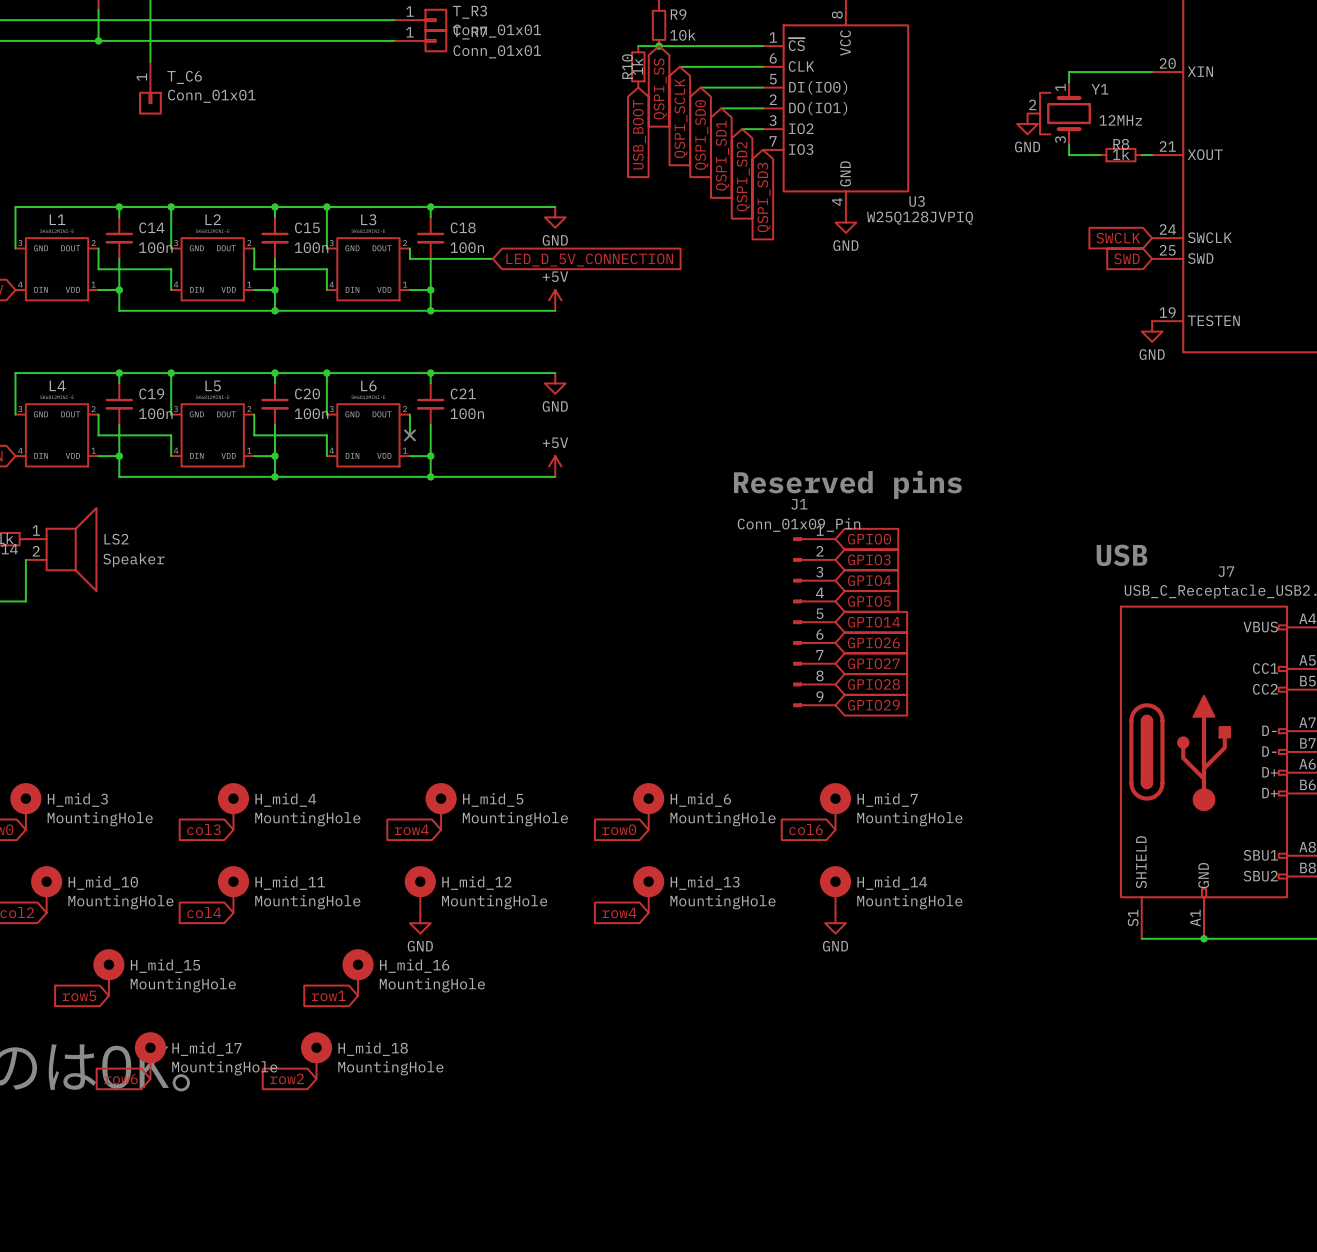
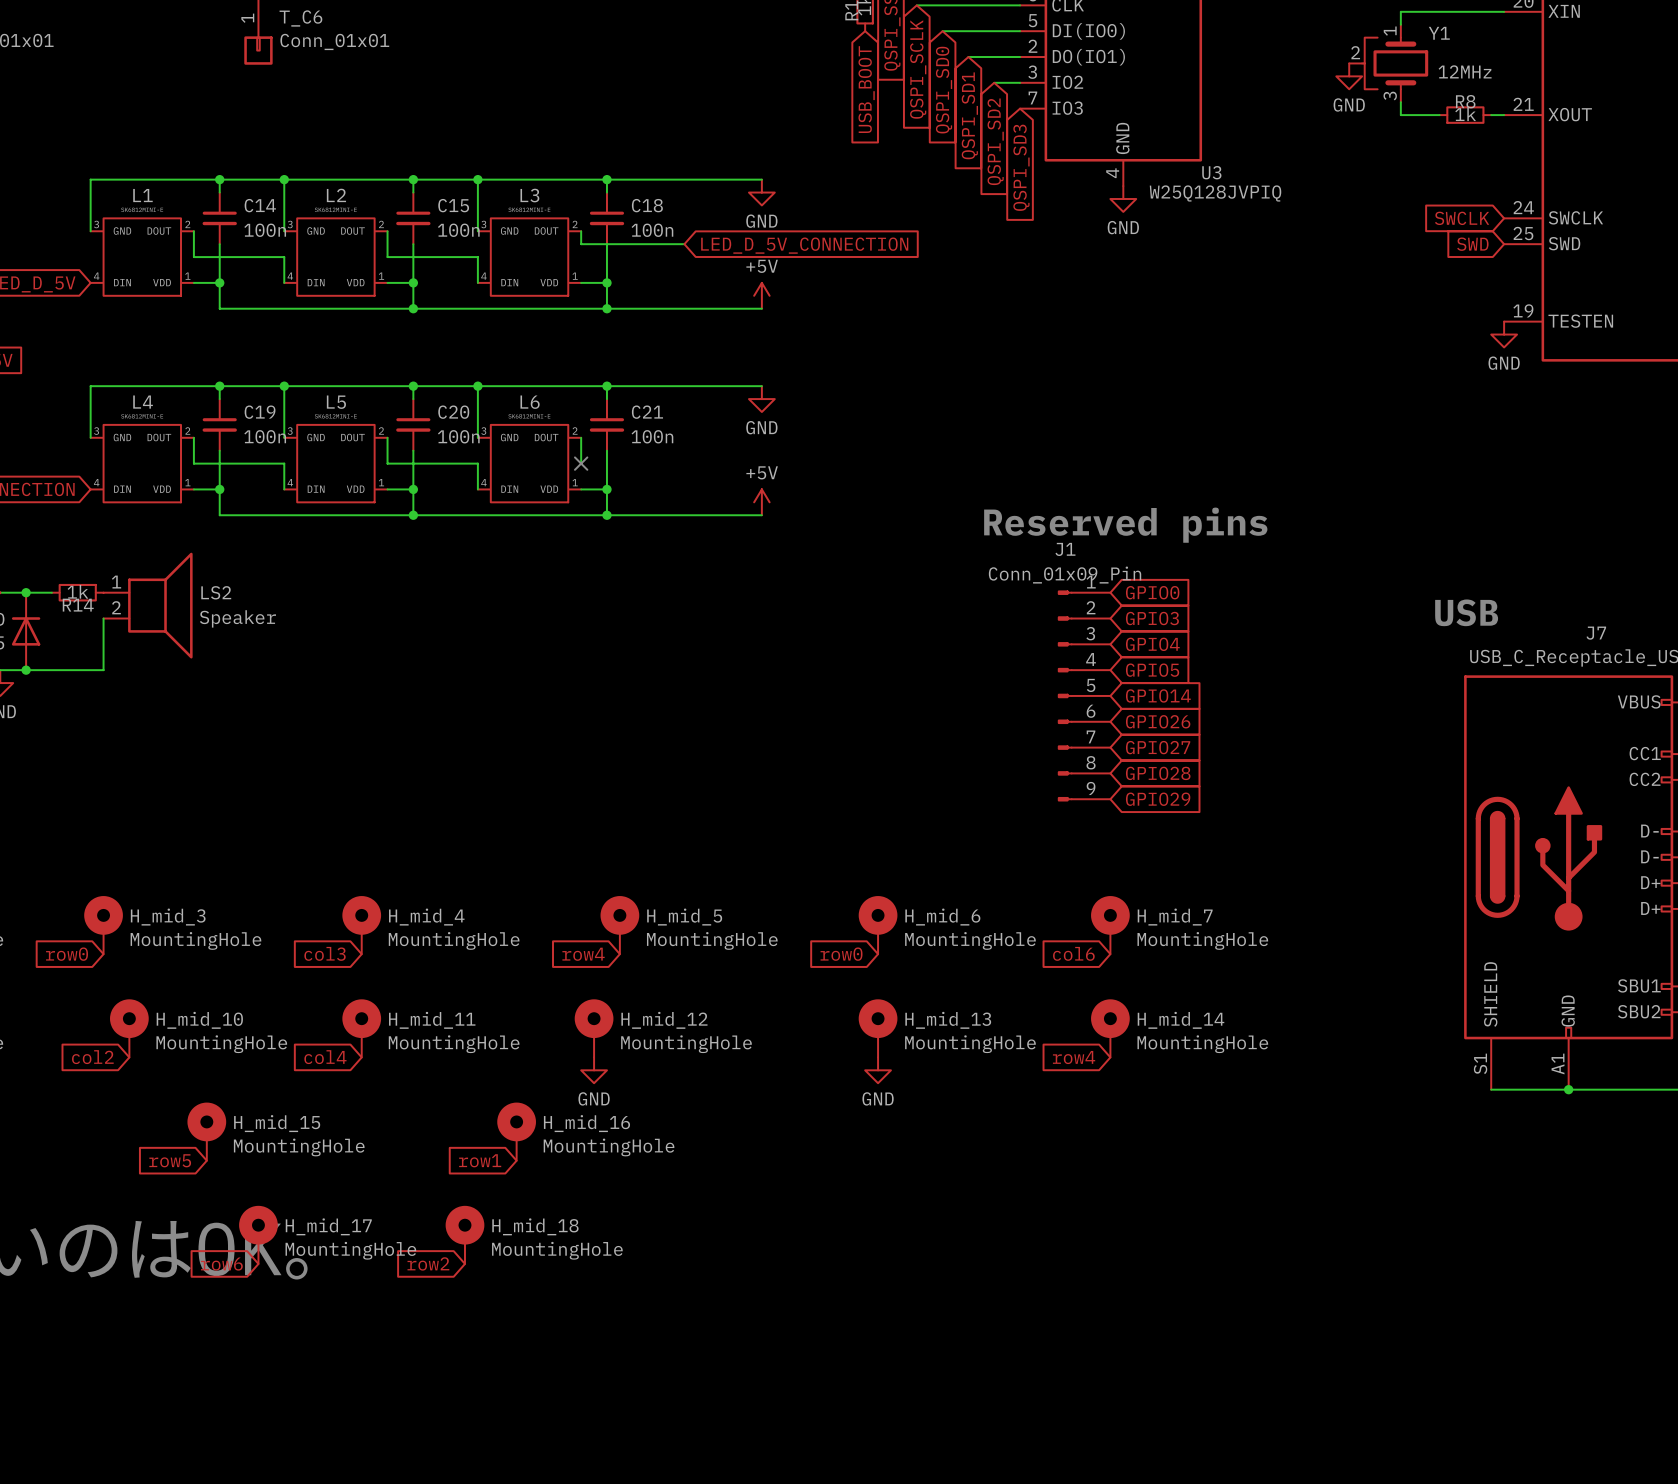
global label position: row4 (619, 912) -> row4 (1074, 1057)
power symbol position: GND (835, 923) -> GND (878, 1070)

